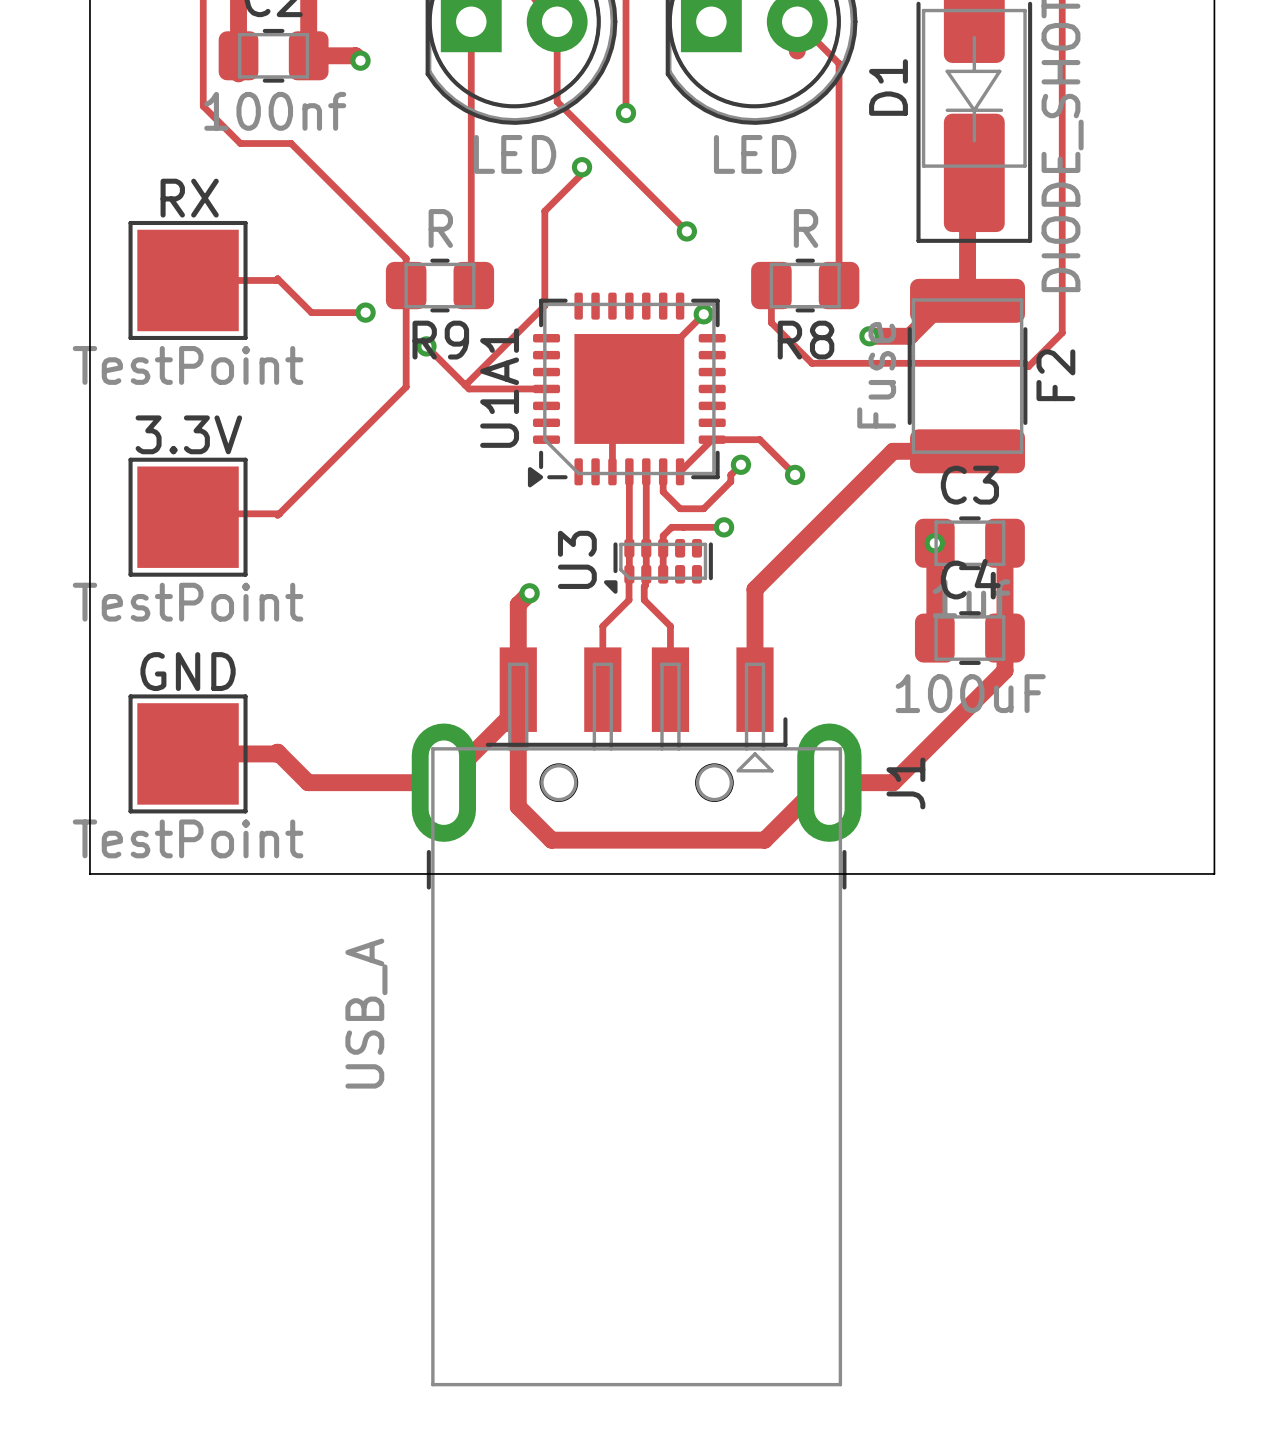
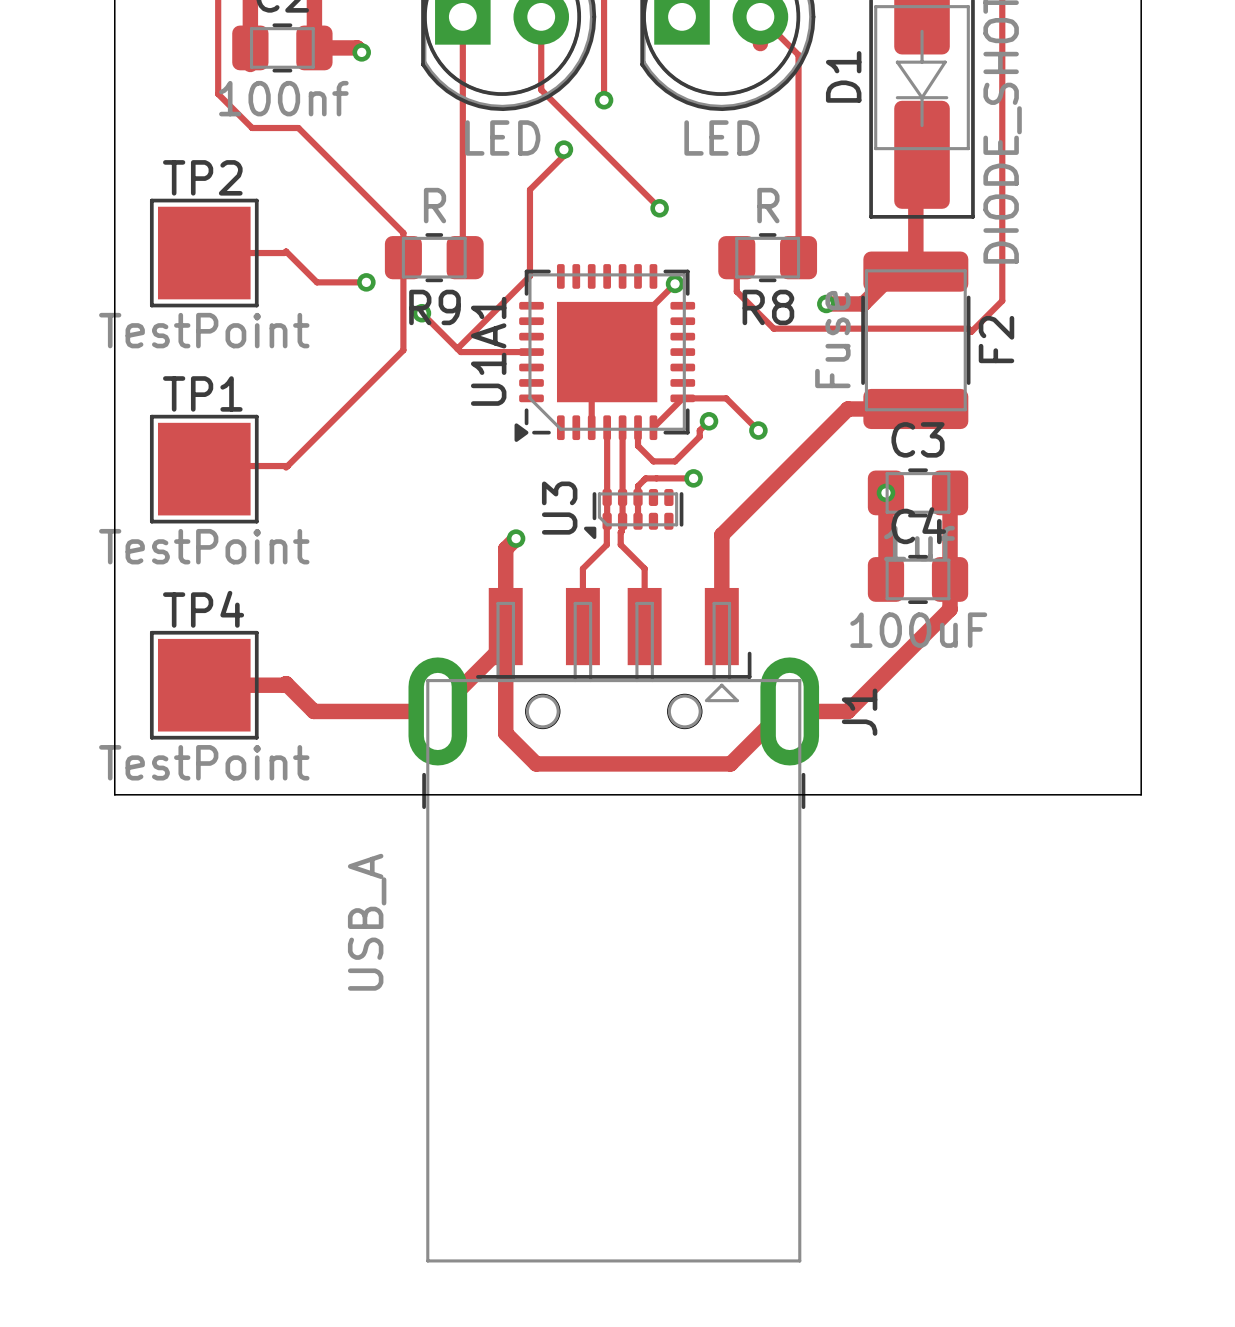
RX name: RX (189, 198) -> TP2 (202, 177)
3.3V name: 3.3V (188, 434) -> TP1 (202, 393)
GND name: GND (188, 671) -> TP4 (203, 609)

